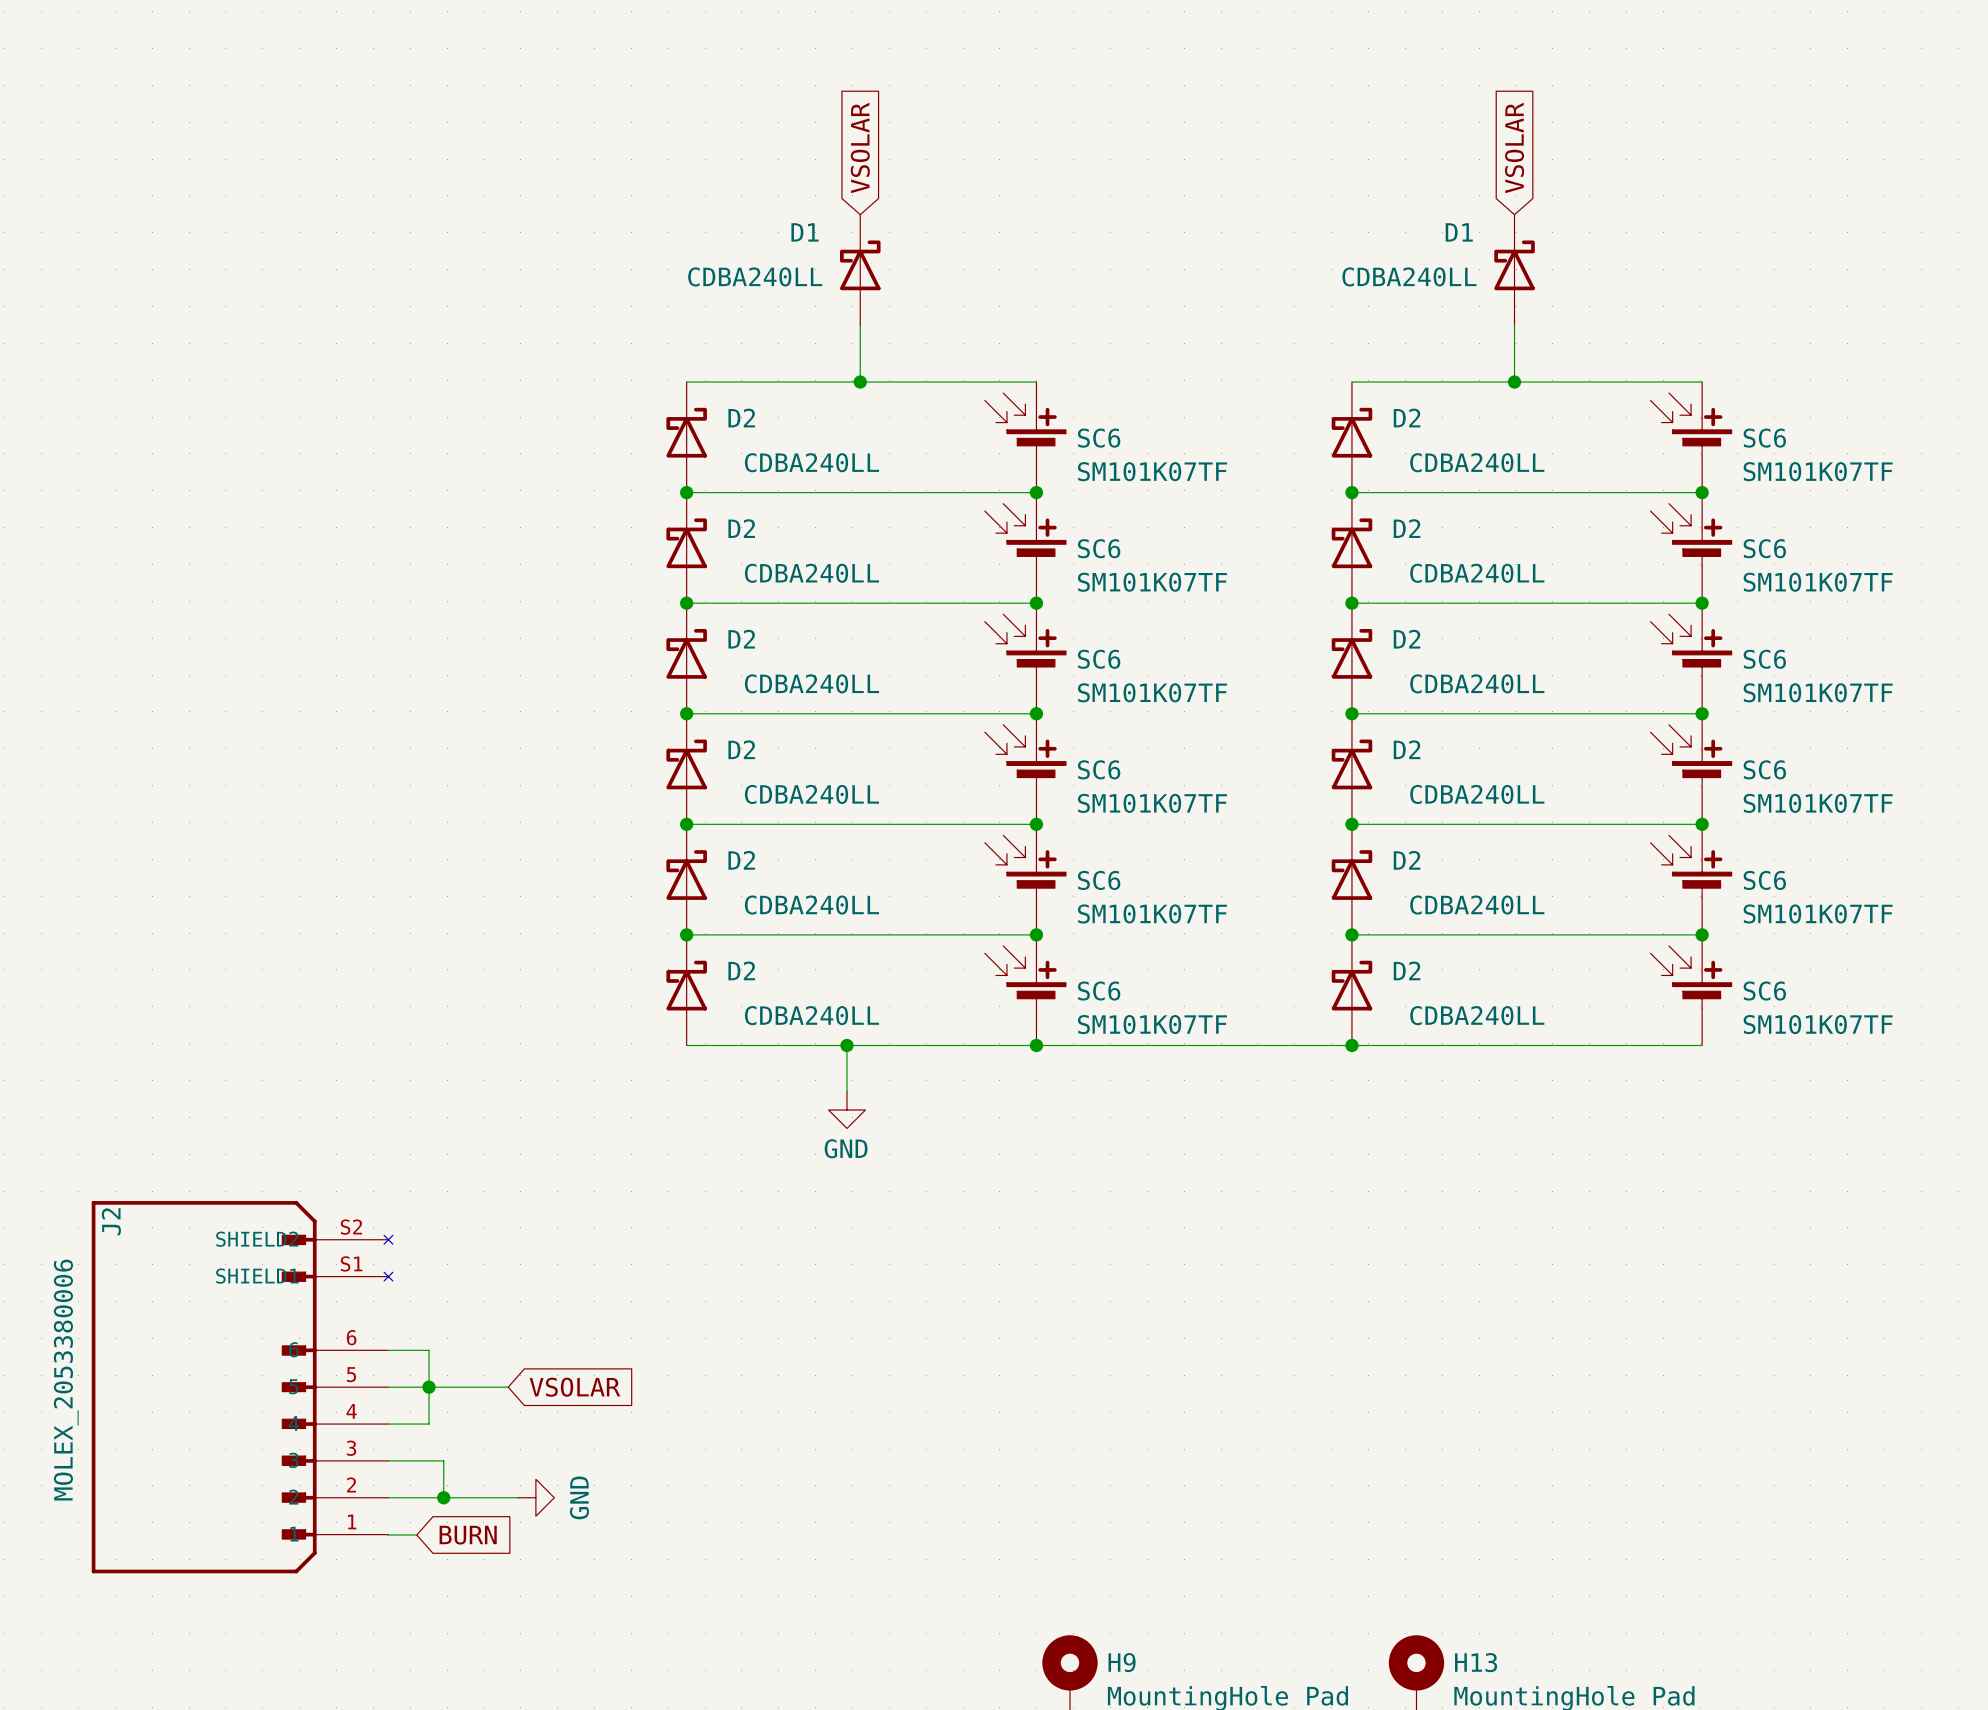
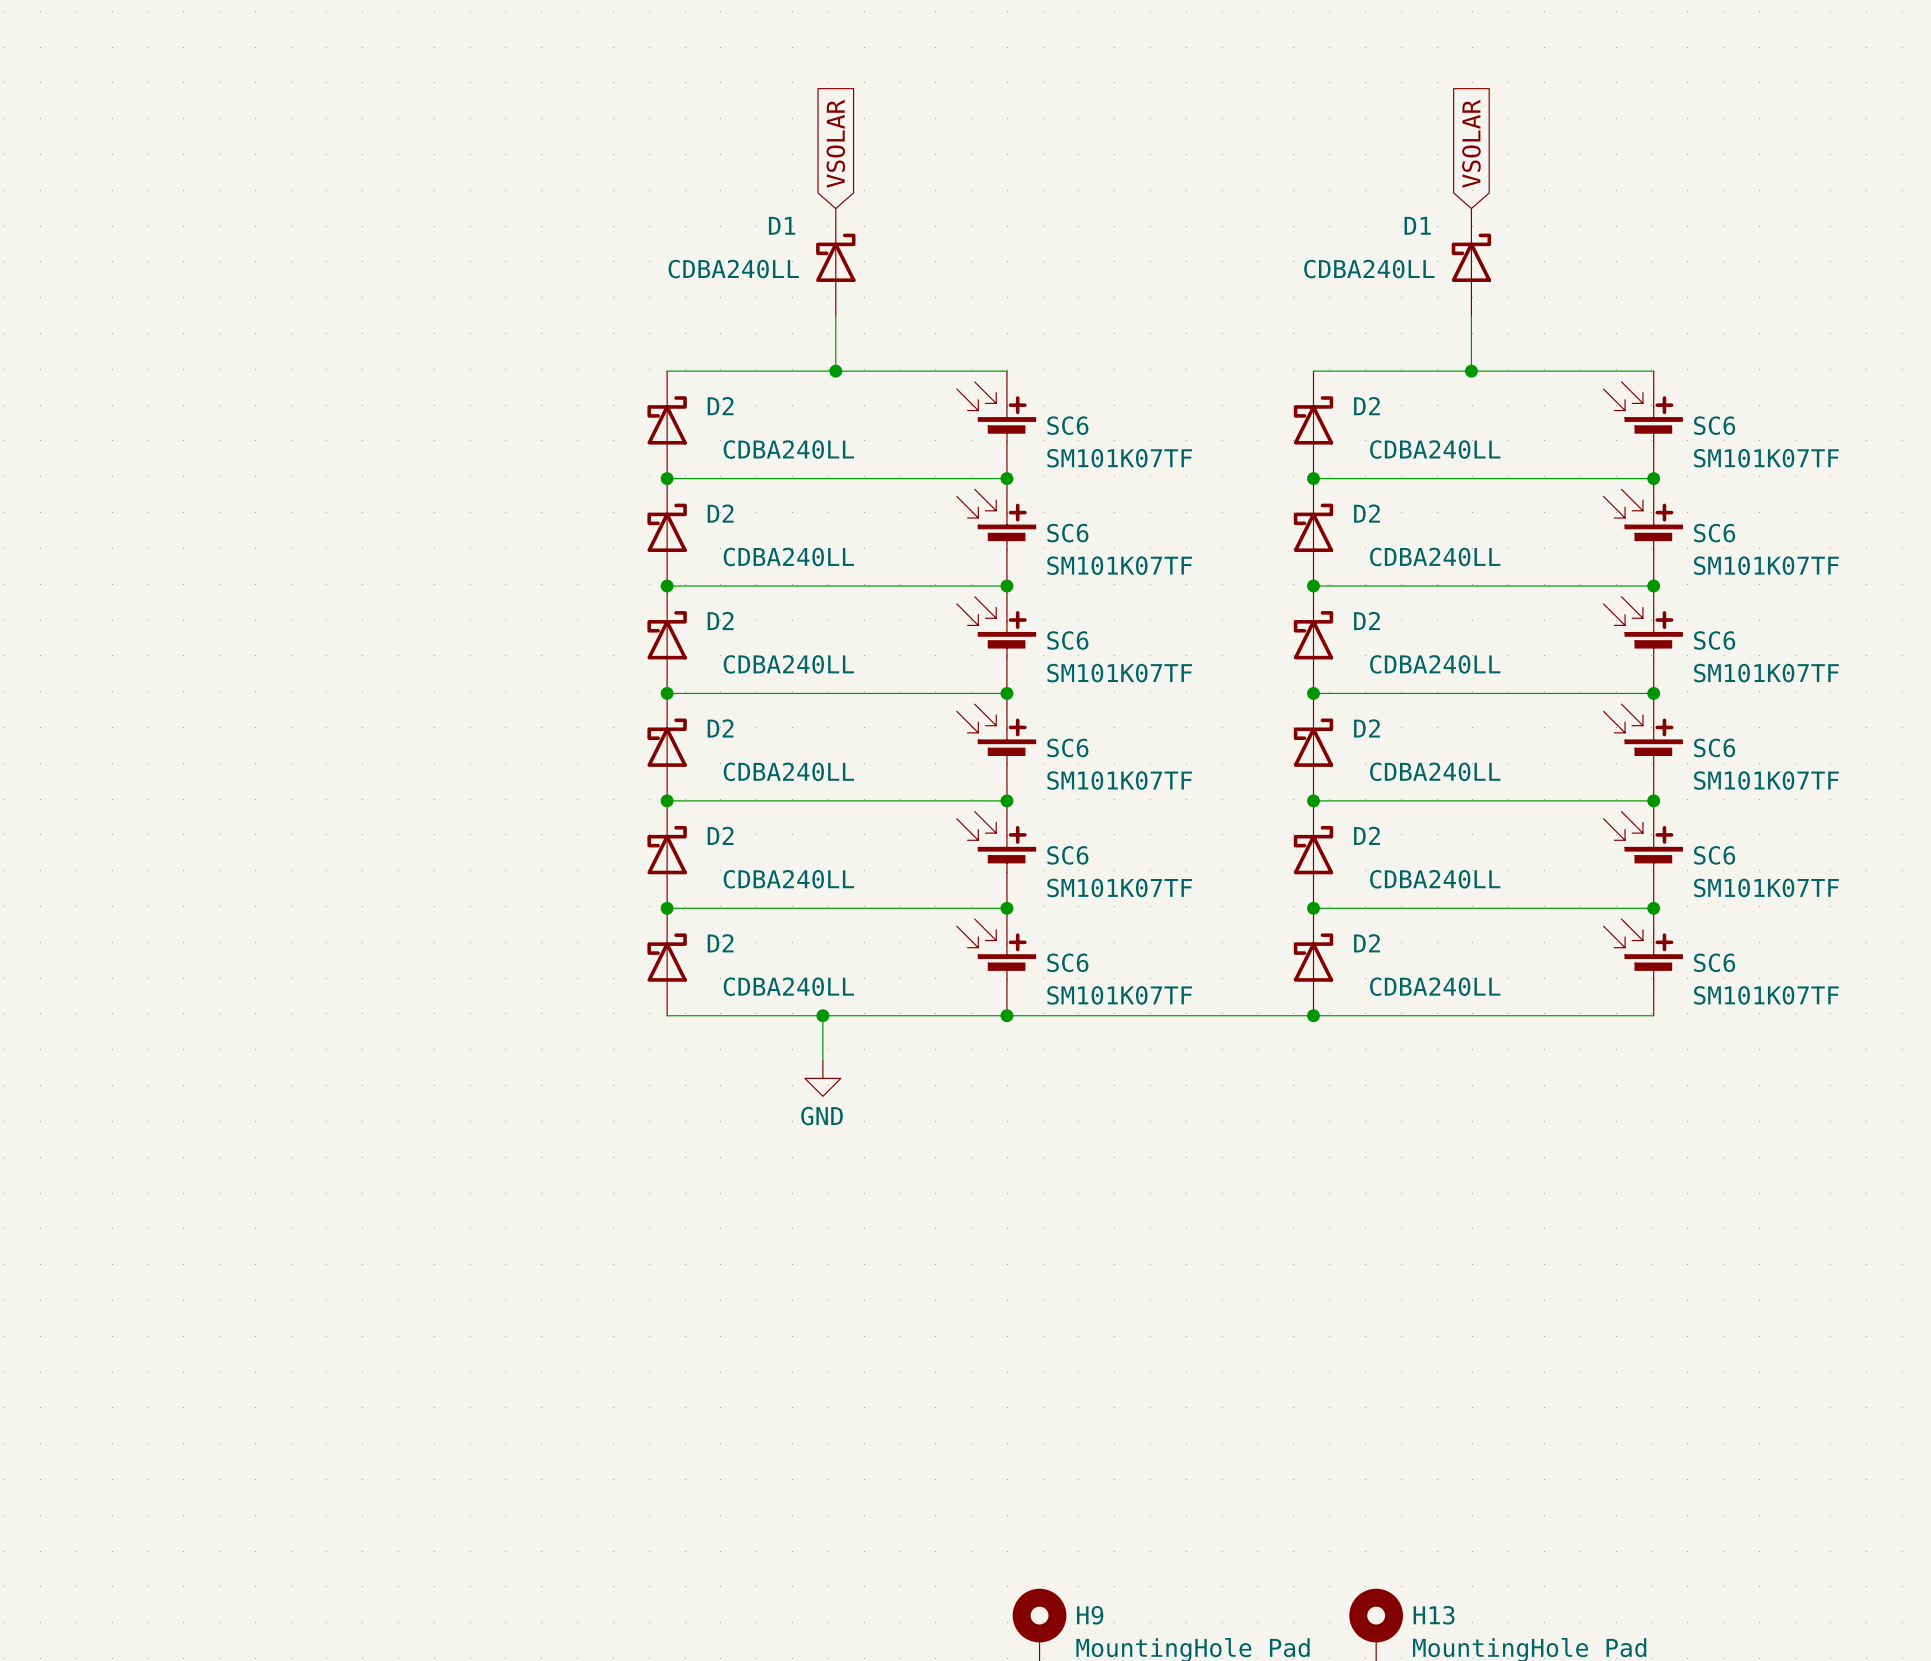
wire: (388, 1350) (429, 1350) (429, 1424) (388, 1424) -> none
J2: MOLEX_2053380006 (242, 1387) -> none
wire: (388, 1387) (508, 1387) -> none
junction: (429, 1387) -> none
global label: VSOLAR (574, 1387) -> none
wire: (388, 1460) (443, 1460) (443, 1497) -> none
wire: (388, 1497) (517, 1497) -> none
junction: (443, 1497) -> none
power symbol: GND (535, 1497) -> none
wire: (388, 1534) (416, 1534) -> none
global label: BURN (468, 1535) -> none

